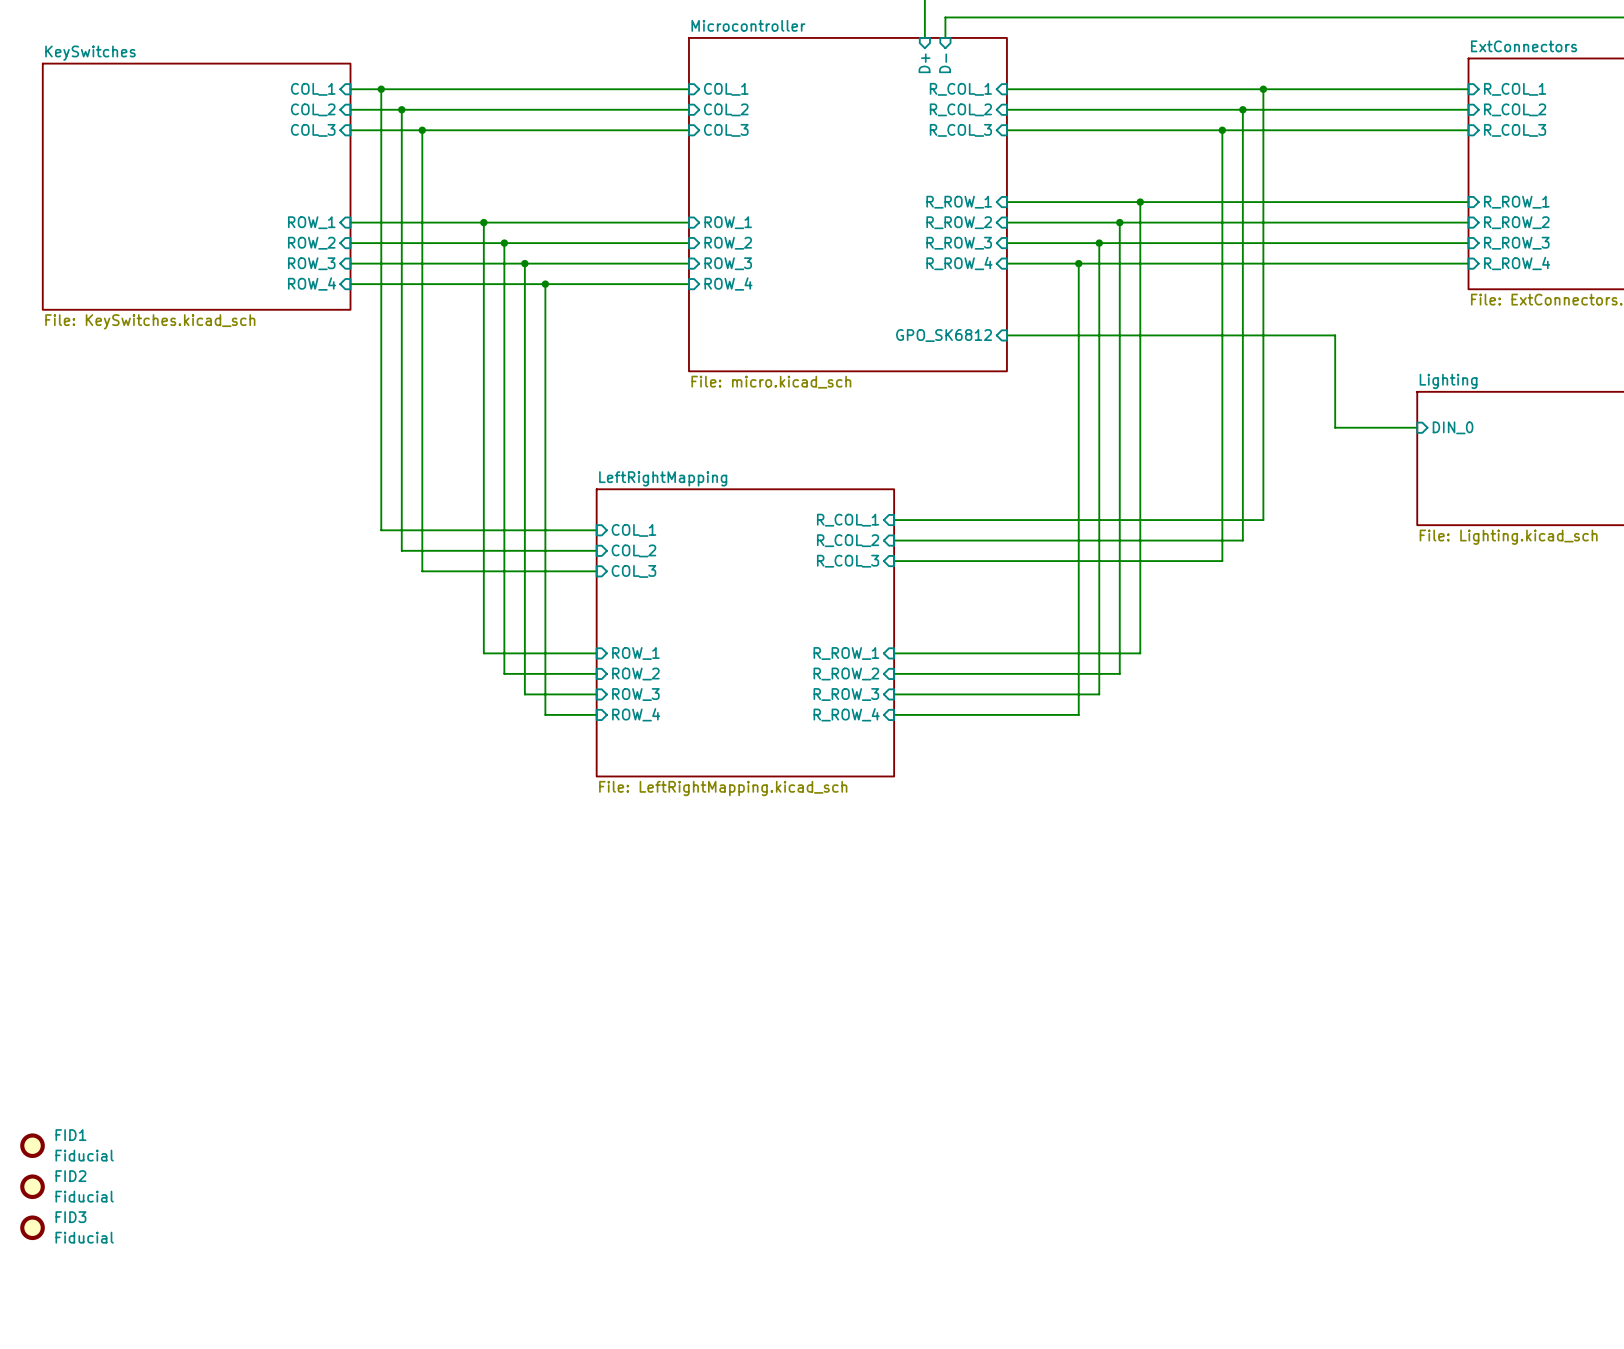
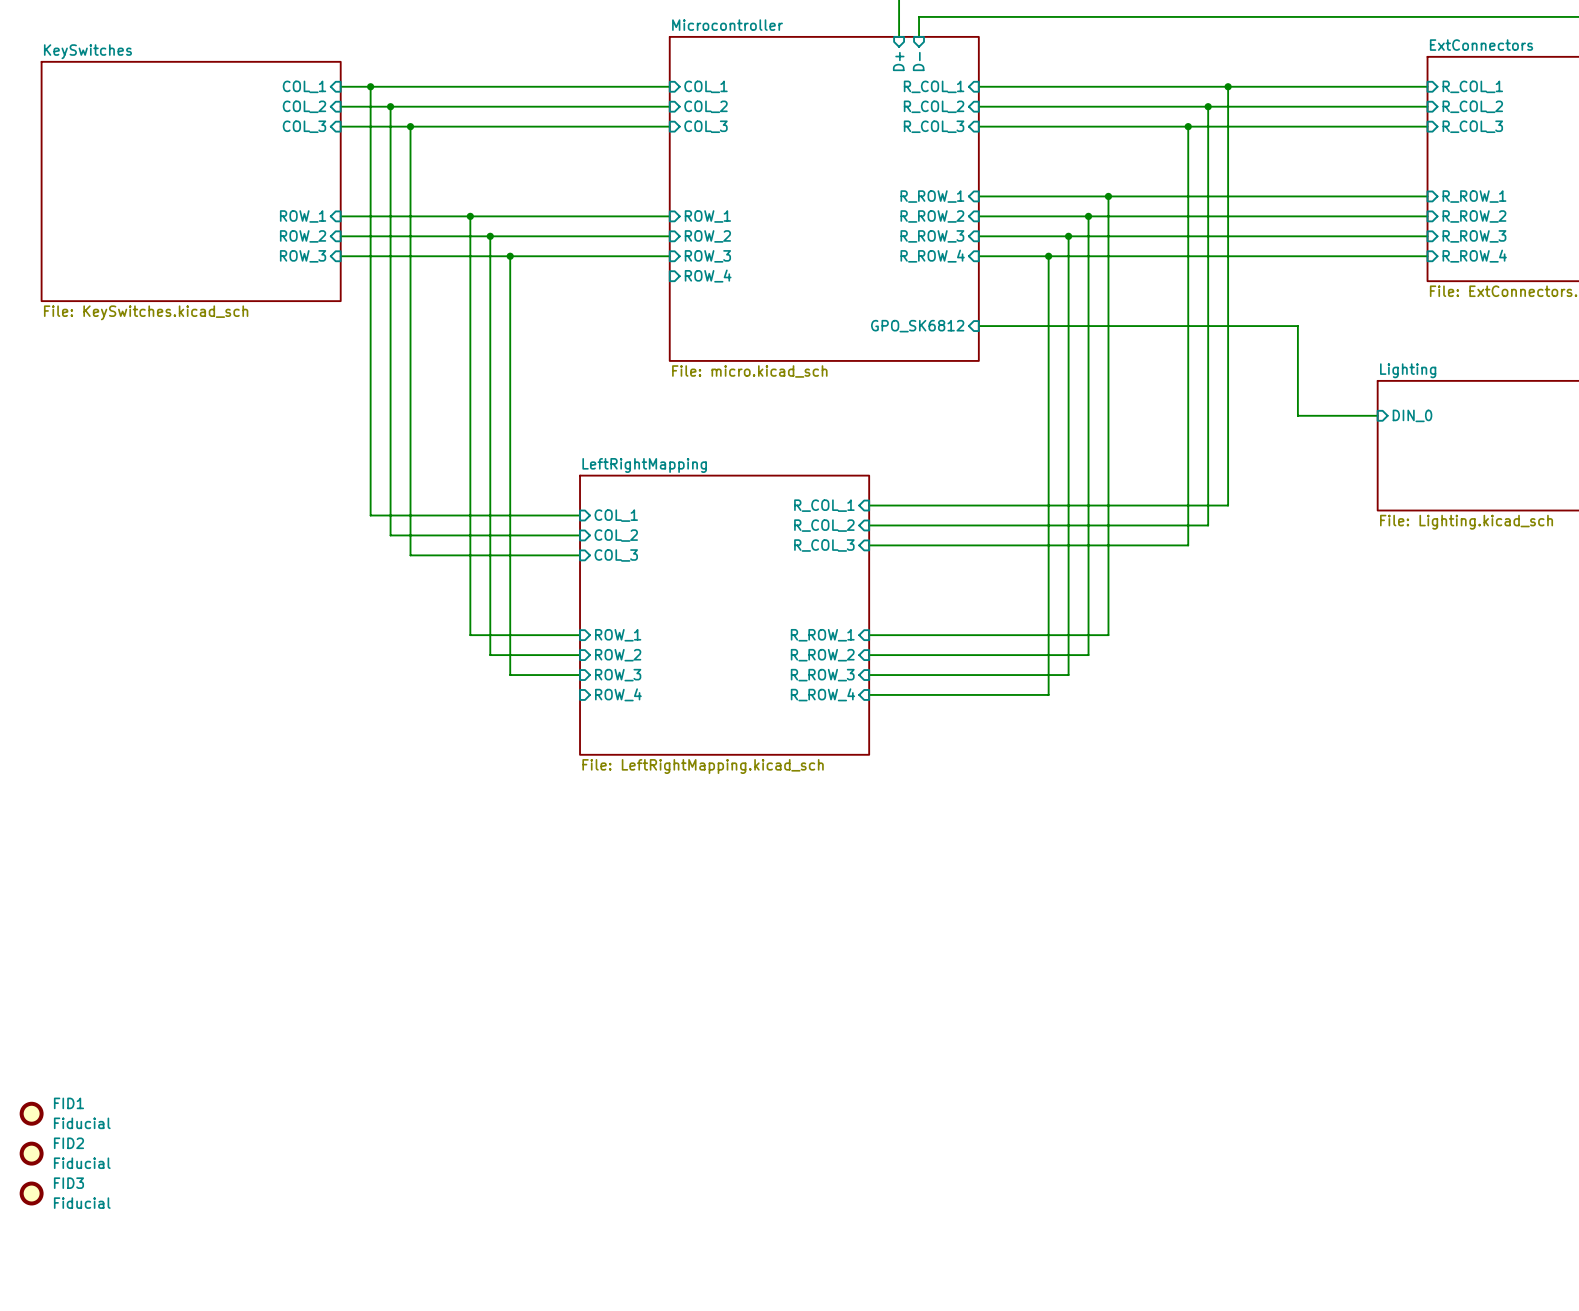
sheet pin: ROW_4 (312, 283) -> none
wire: (350, 284) (688, 284) -> none
wire: (545, 284) (545, 714) (596, 714) -> none
junction: (545, 284) -> none

